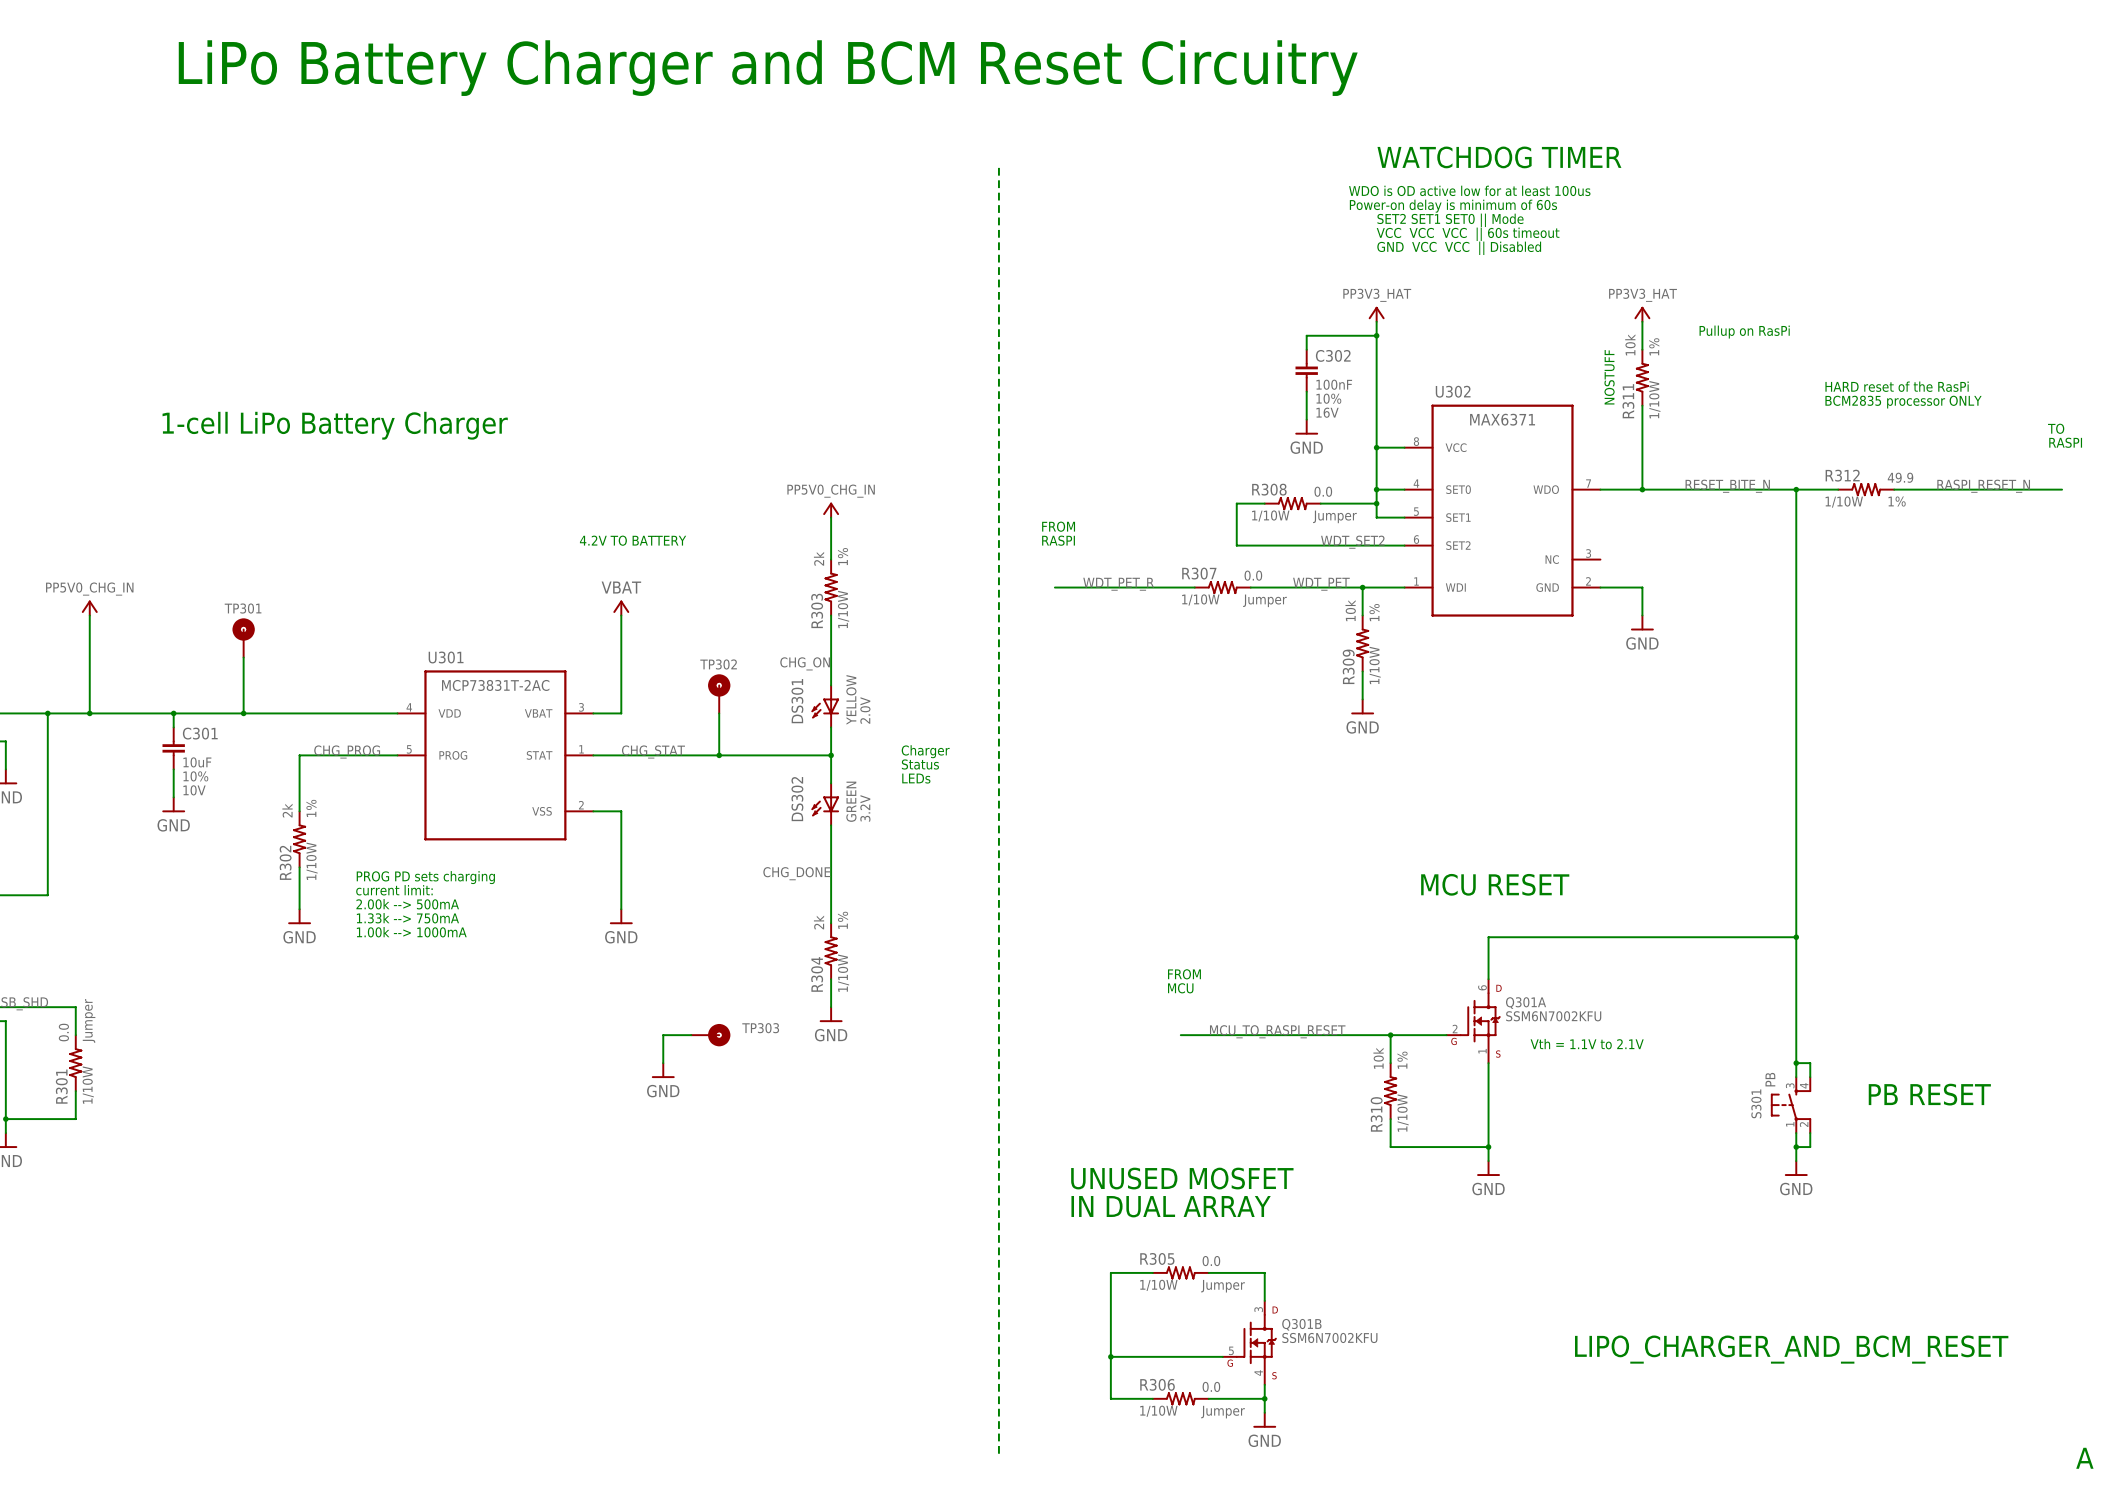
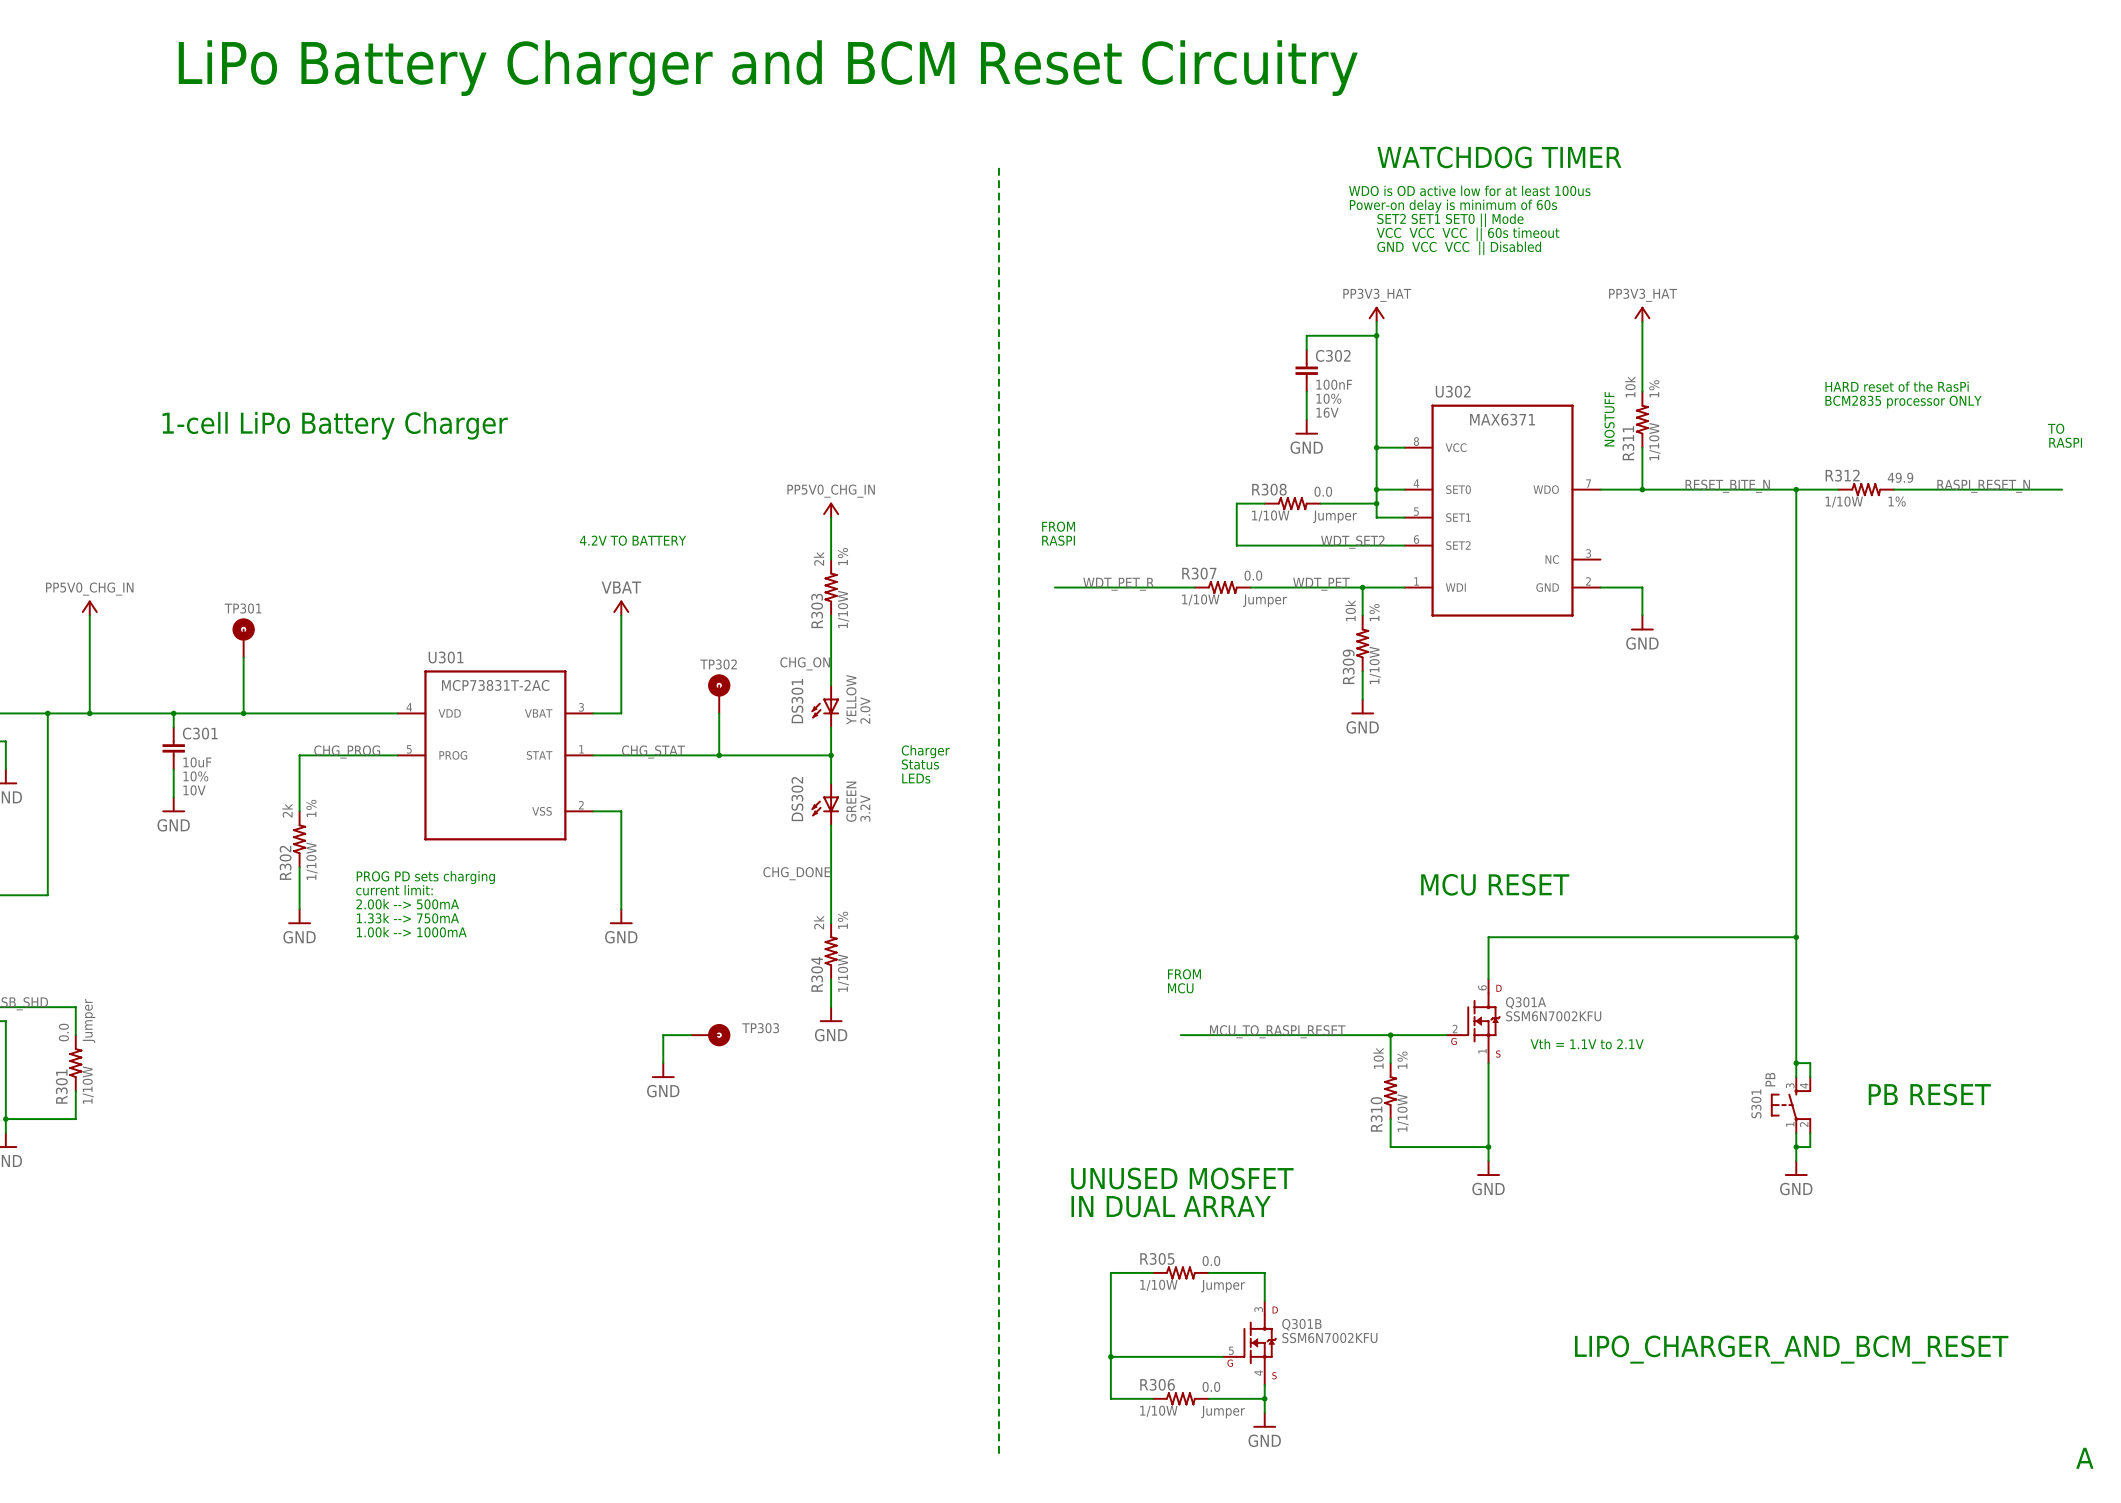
text: Pullup on RasPi (1744, 332) -> none
text position: NOSTUFF (1609, 377) -> NOSTUFF (1609, 419)
R311 position: (1642, 377) -> (1642, 419)

